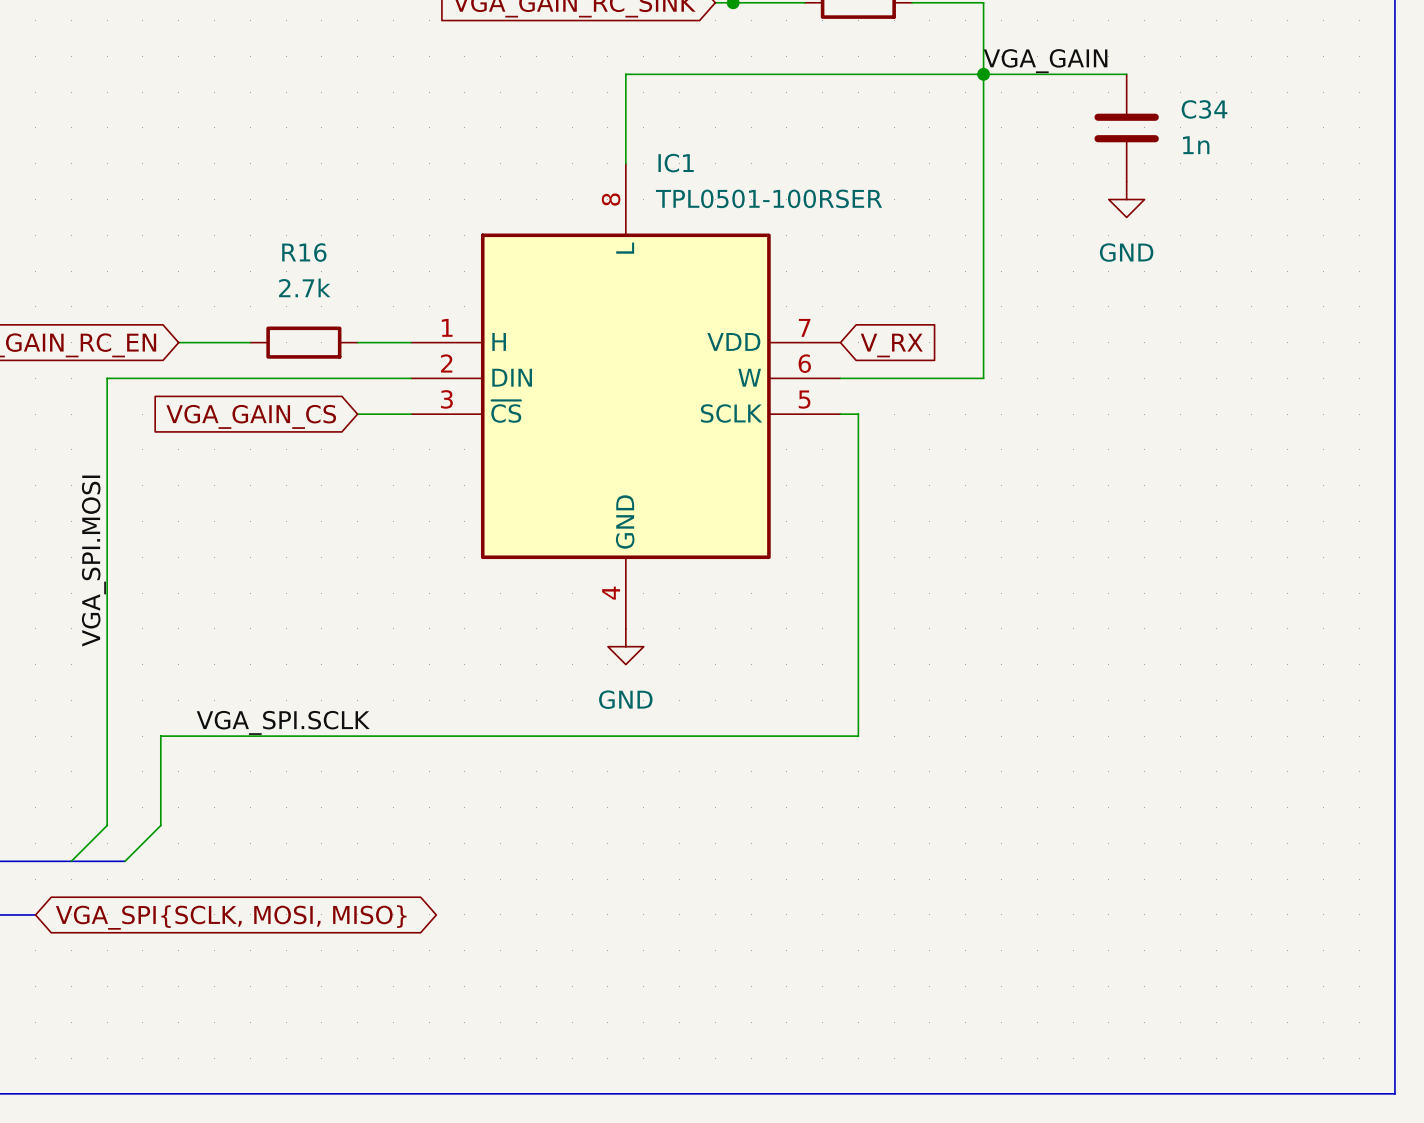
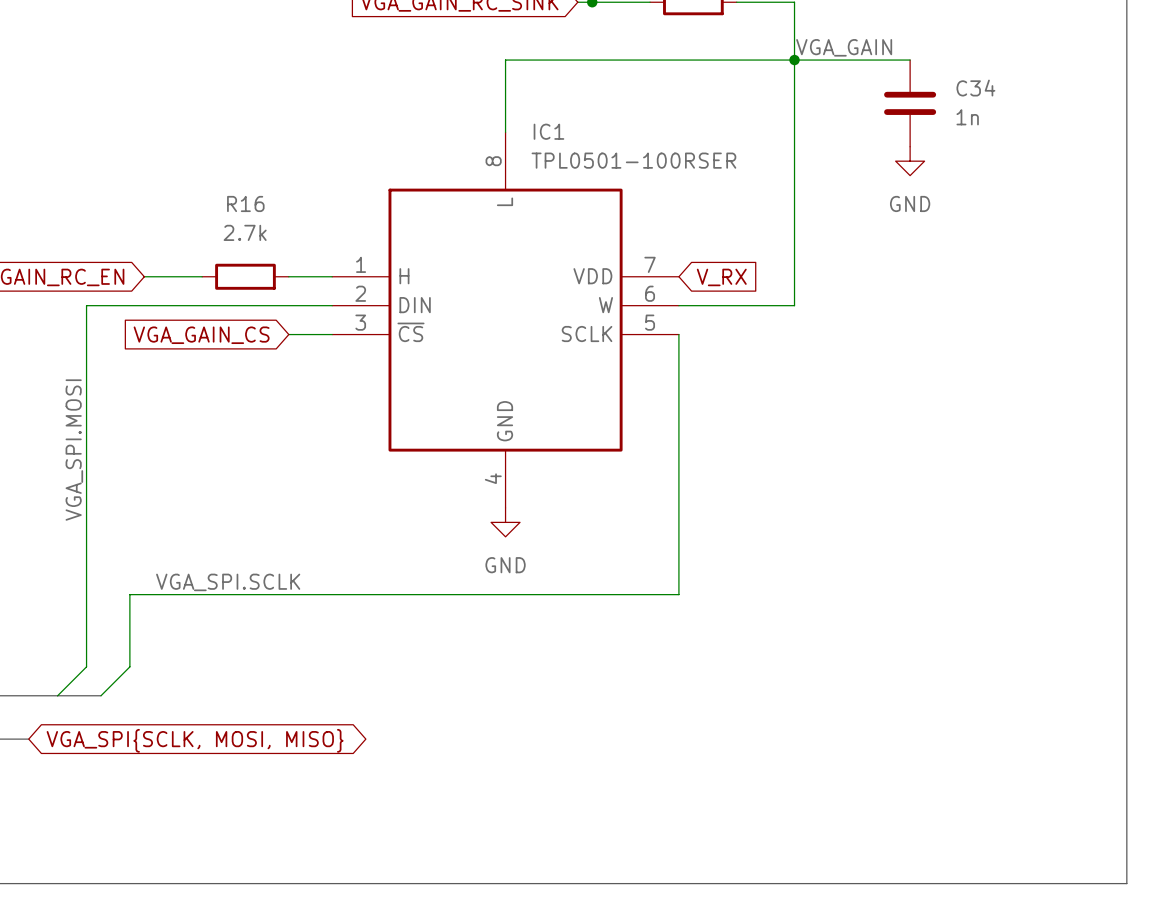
wire: (840, 414) (858, 414) (858, 736) (840, 736) -> (678, 334) (678, 594)
label position: VGA_SPI.SCLK (283, 722) -> VGA_SPI.SCLK (228, 582)

